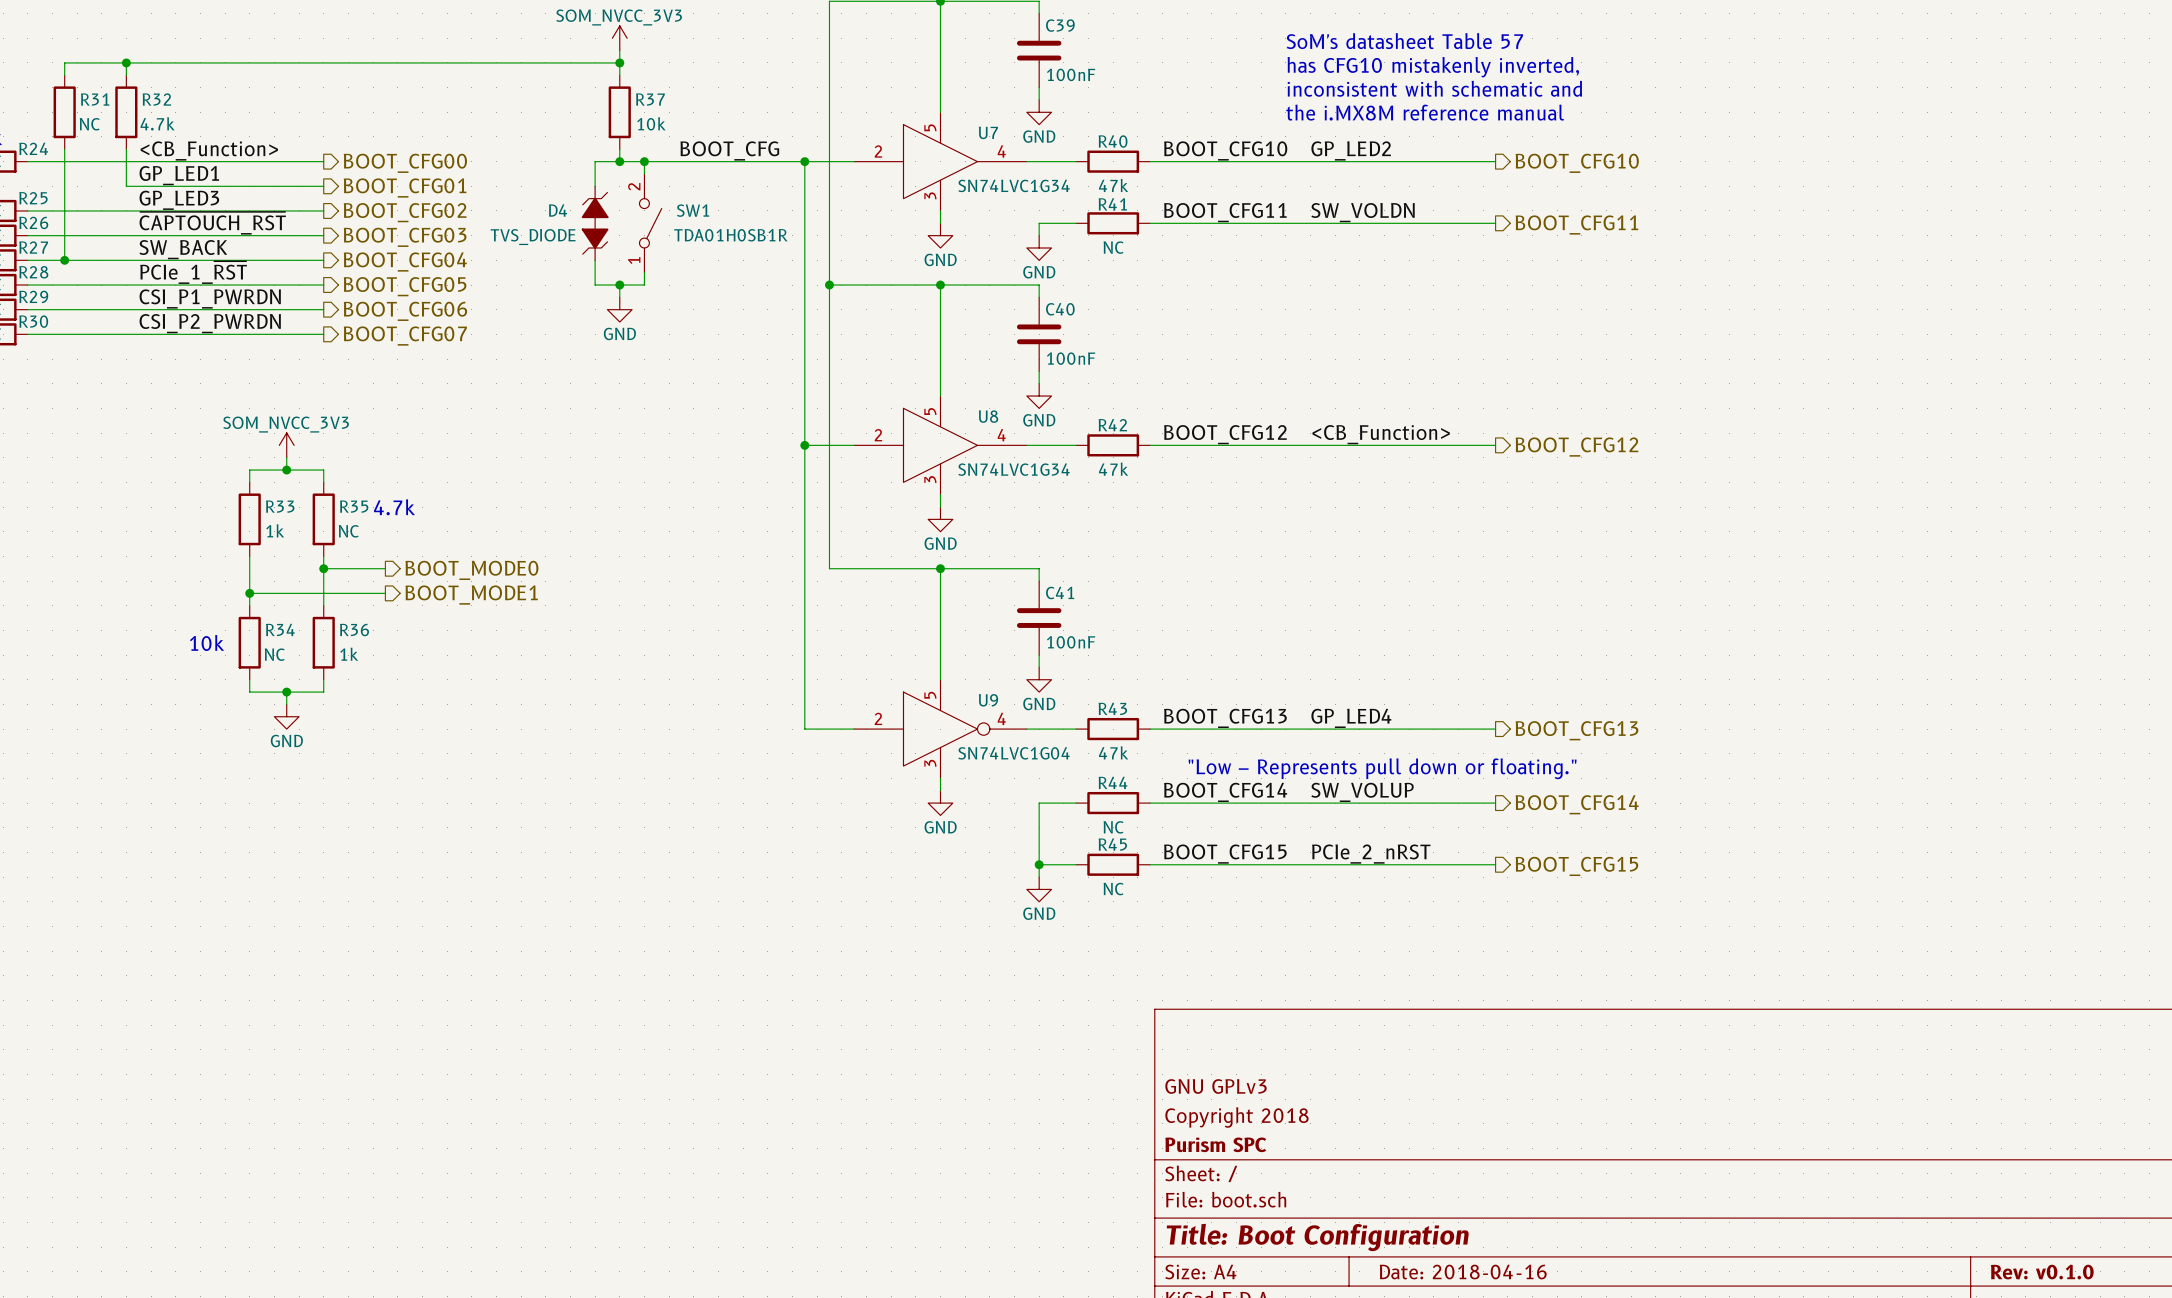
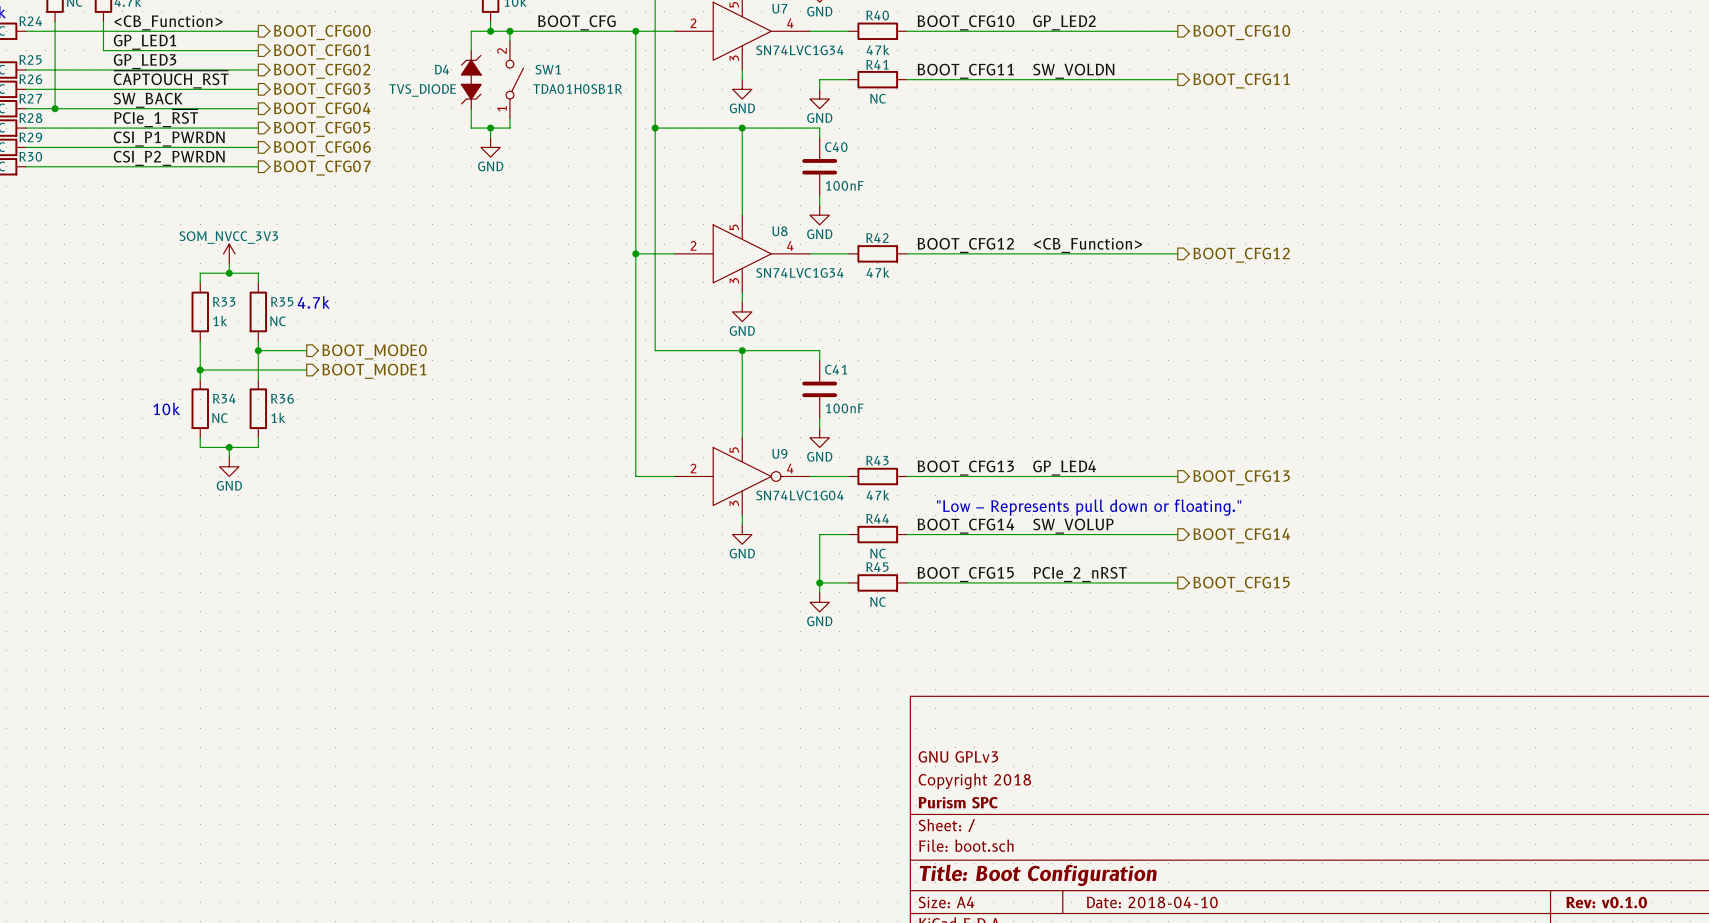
title block: Date: 2018-04-16 (1463, 1272) -> Date: 2018-04-10 (1152, 902)

